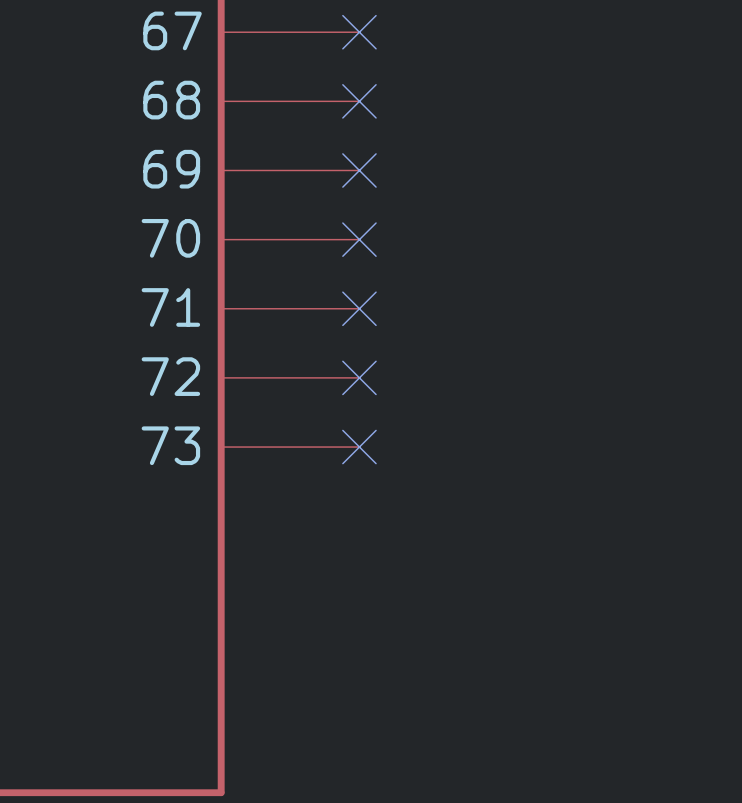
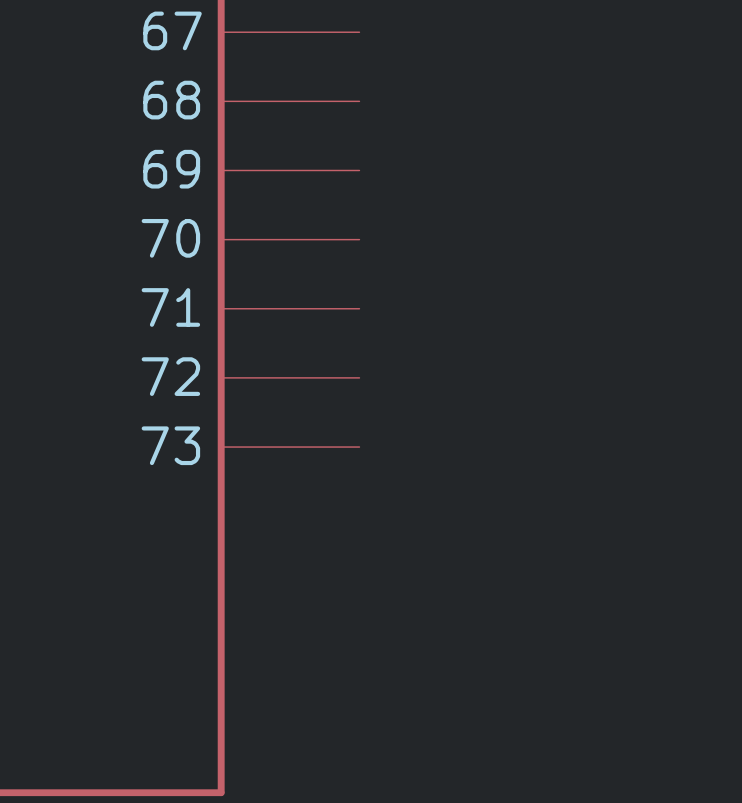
no-connect mark: (359, 32) -> none
no-connect mark: (359, 101) -> none
no-connect mark: (359, 170) -> none
no-connect mark: (359, 239) -> none
no-connect mark: (359, 308) -> none
no-connect mark: (359, 377) -> none
no-connect mark: (359, 447) -> none

